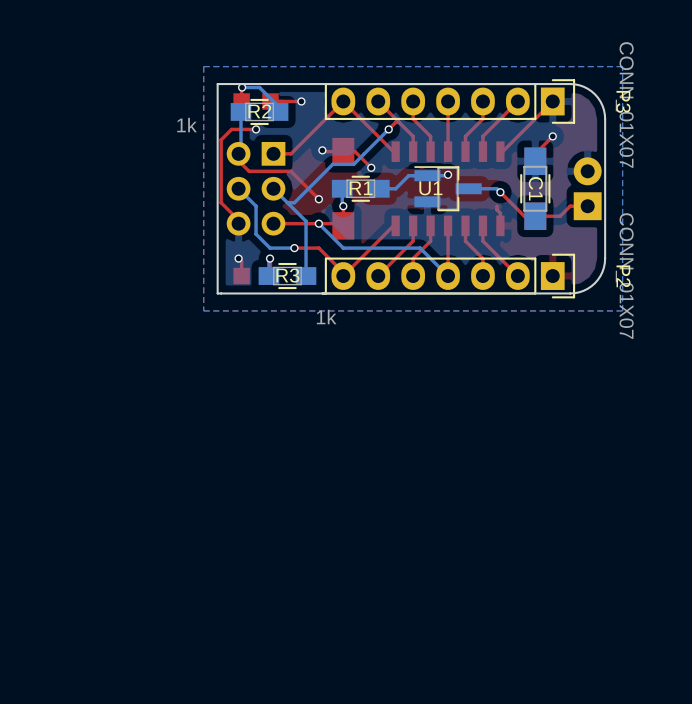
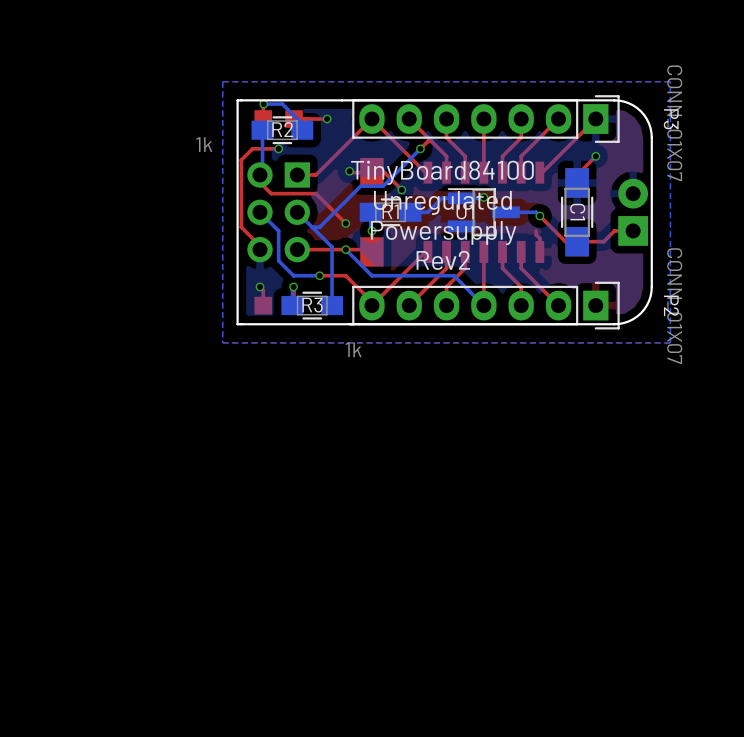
text: none -> TinyBoard84100 (442, 172)
text: none -> Unregulated (442, 202)
text: none -> Powersupply (443, 233)
text: none -> Rev2 (443, 260)

